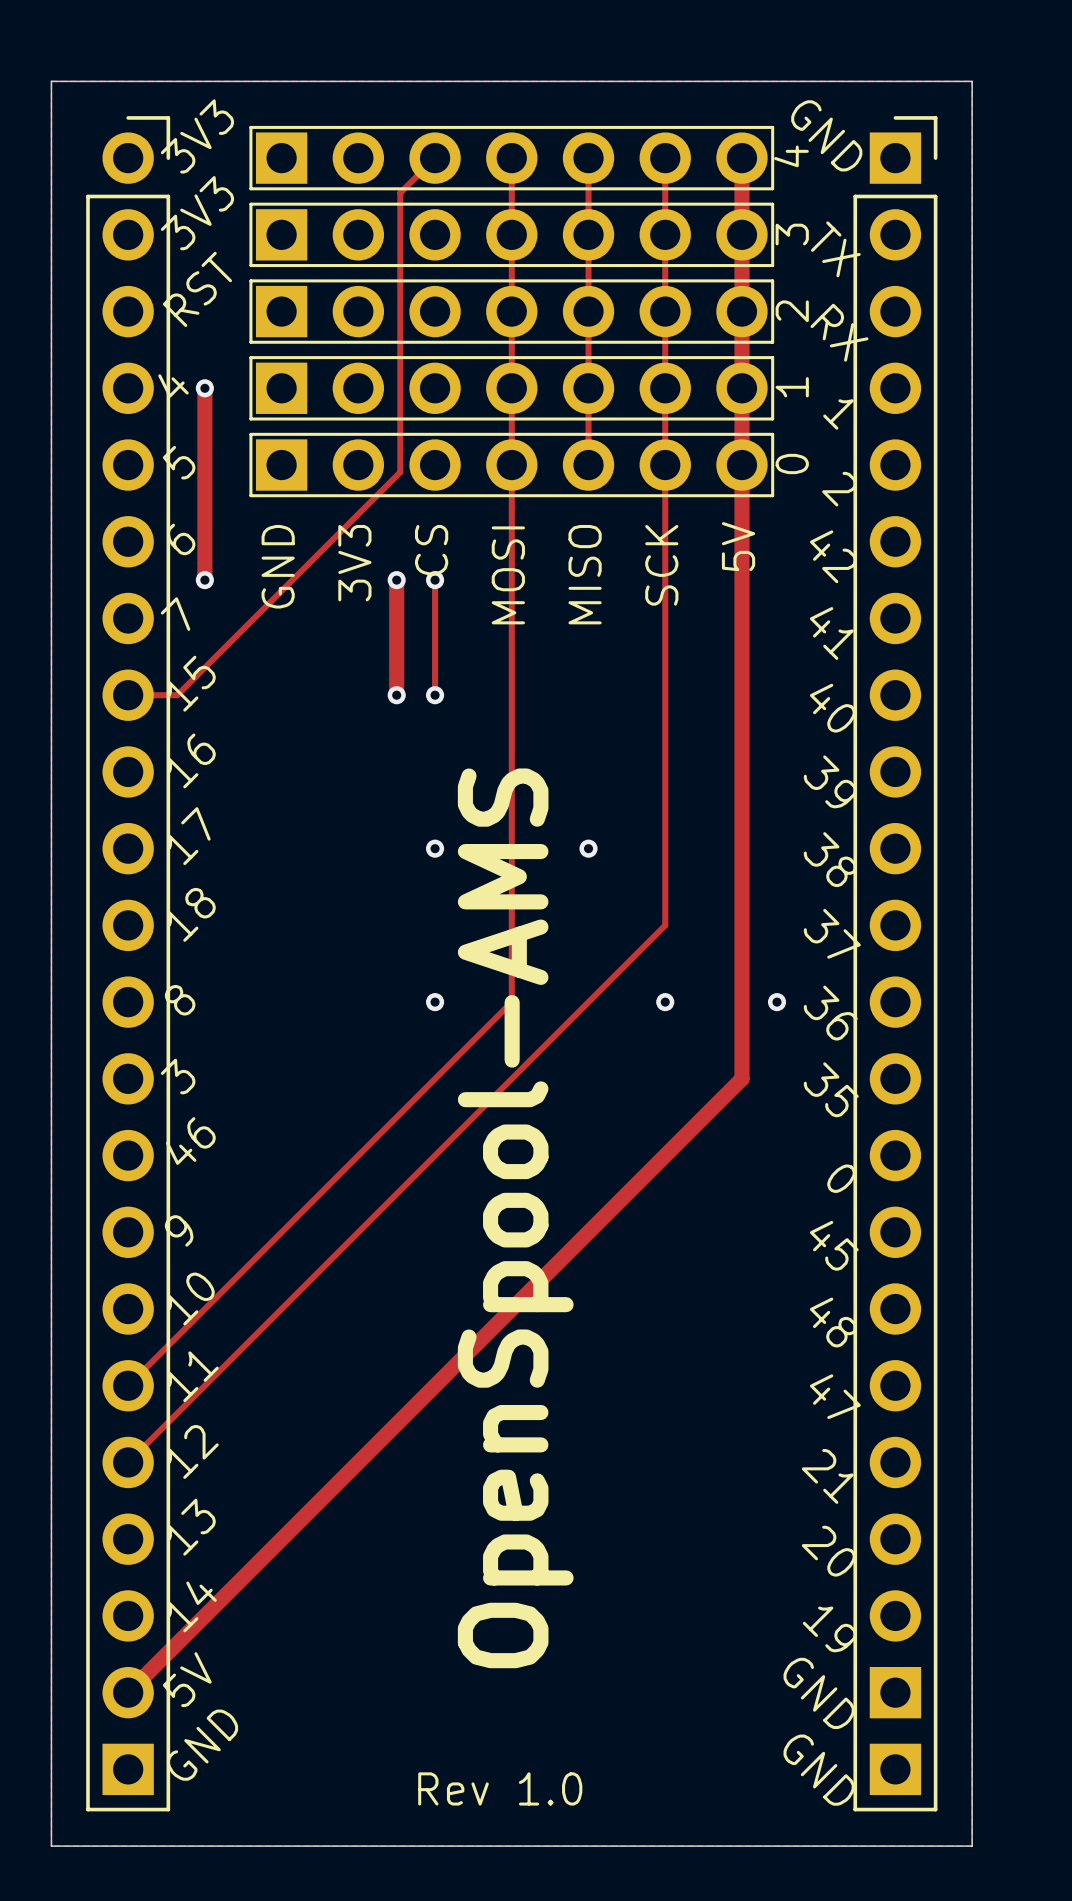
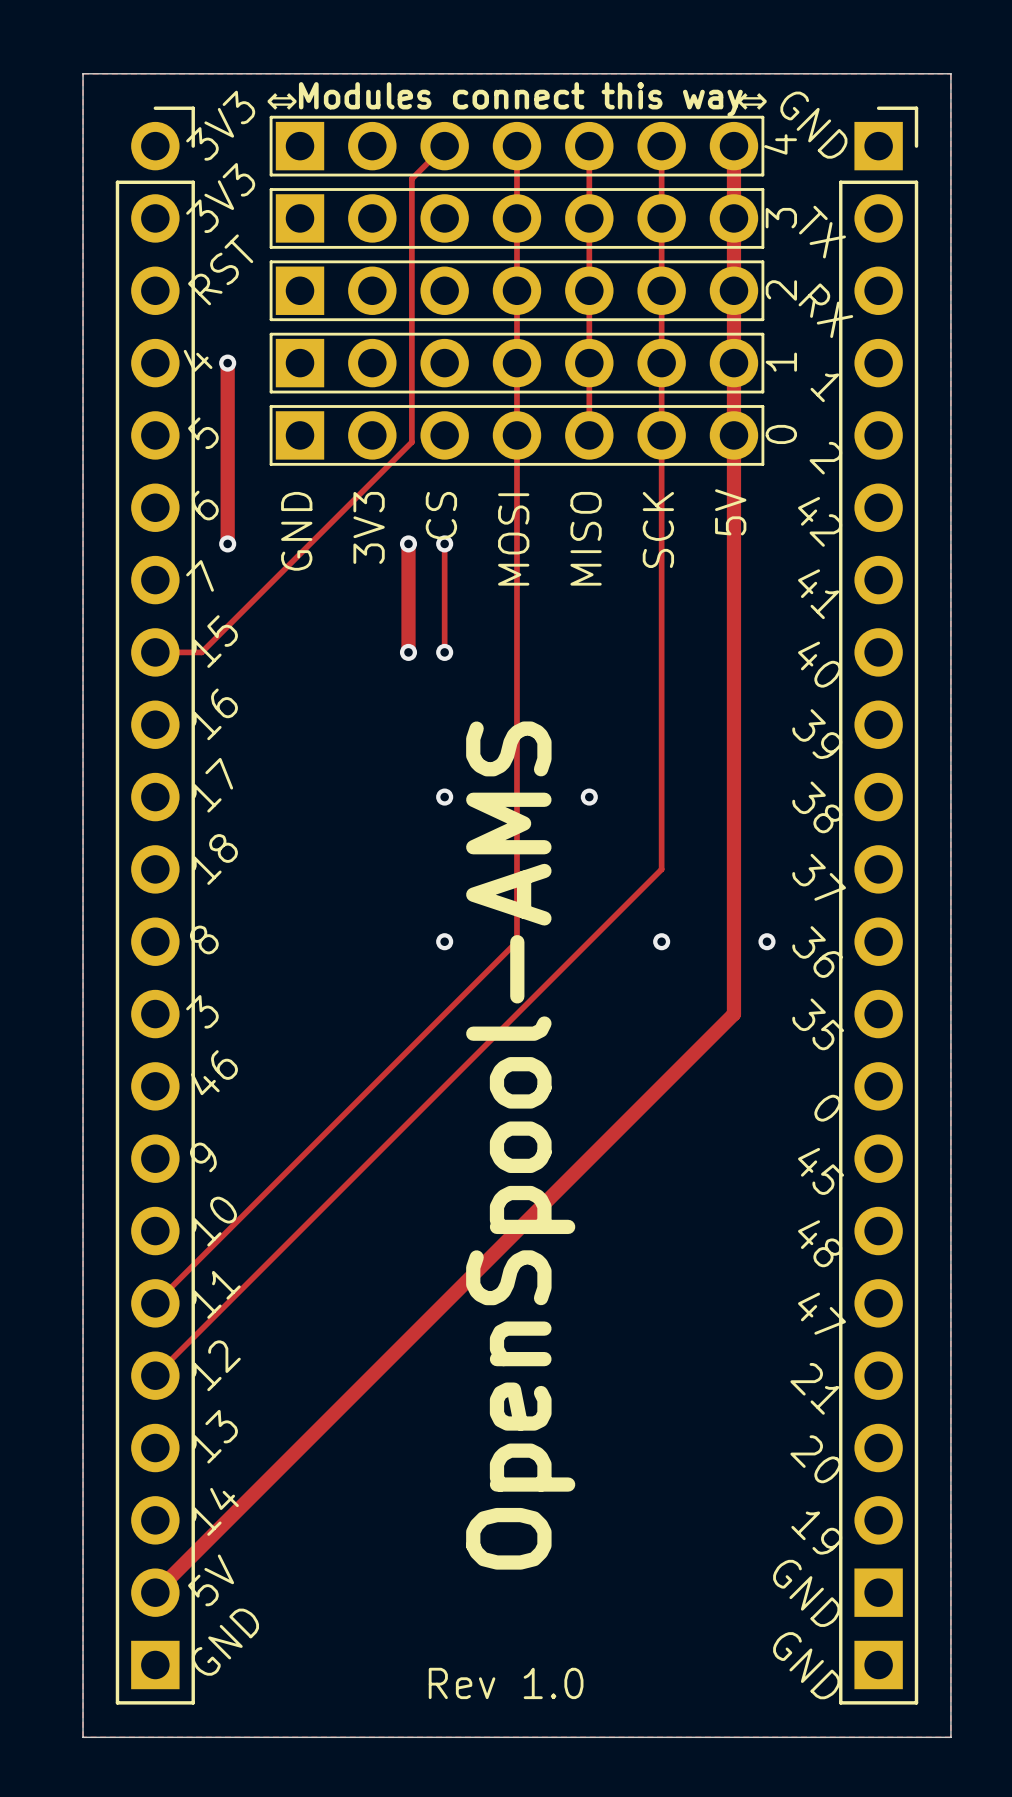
text: none -> Modules connect this way (520, 99)
text: none -> ⇔ (282, 101)
text: none -> ⇔ (752, 101)

